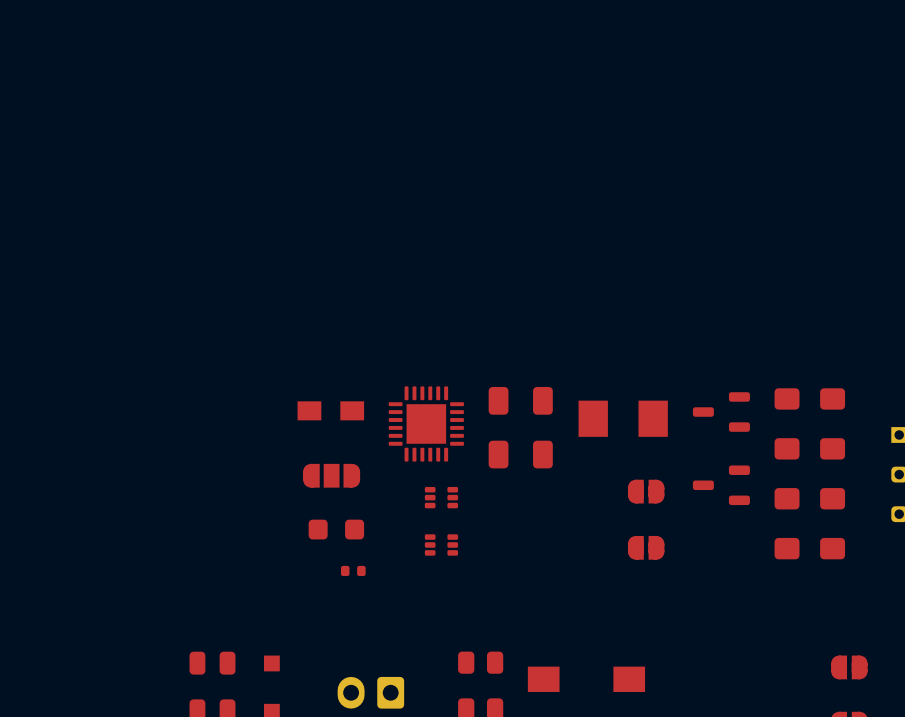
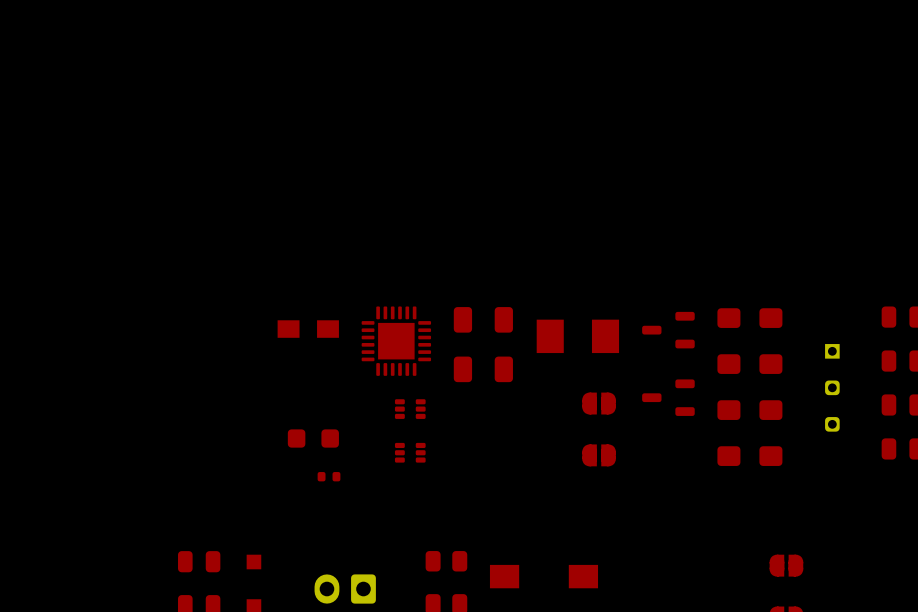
part: (331, 475) -> none

